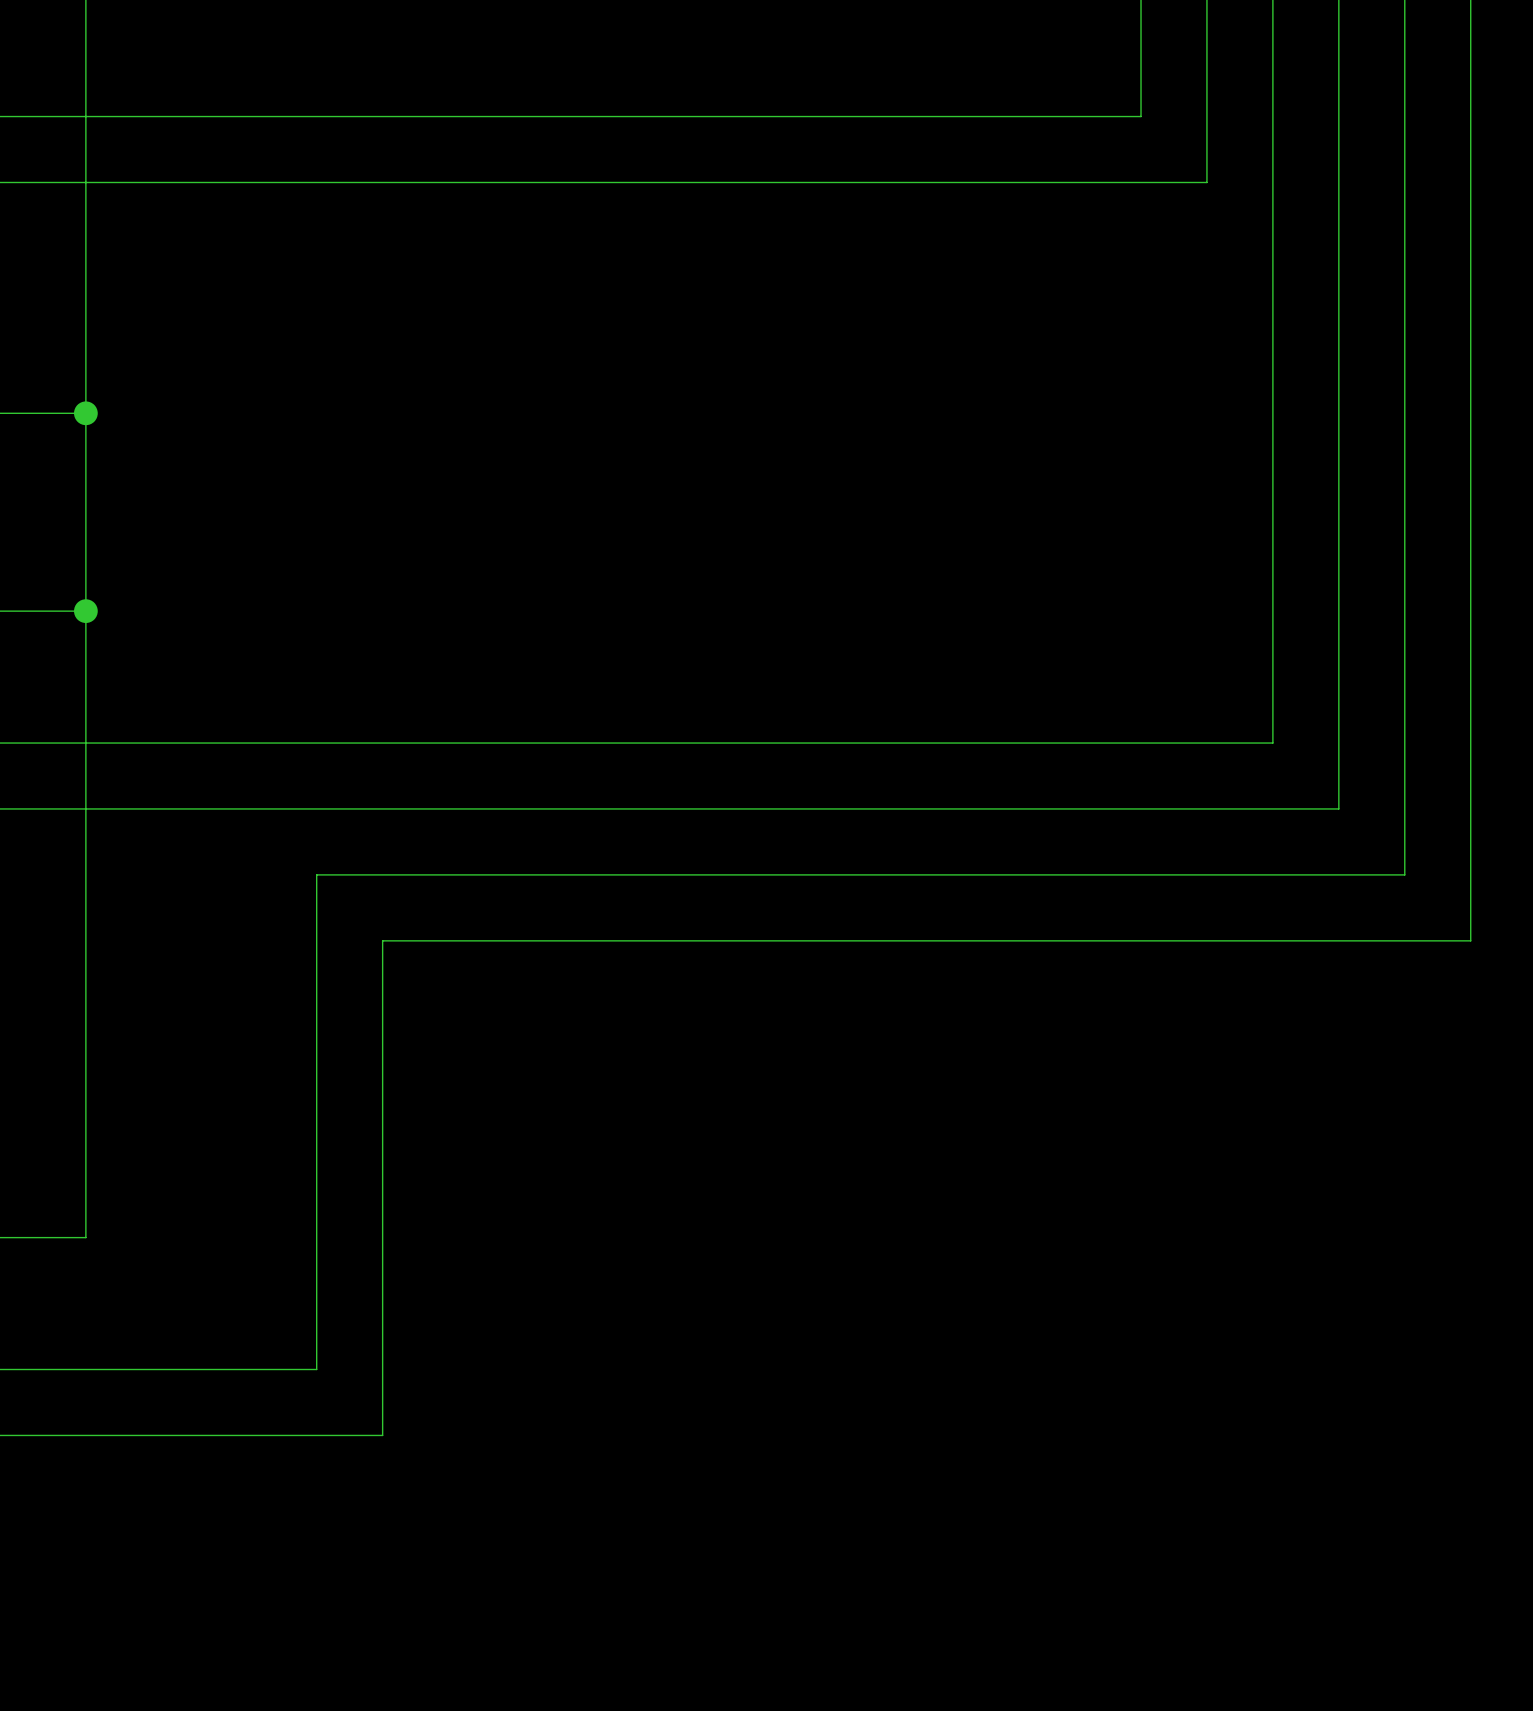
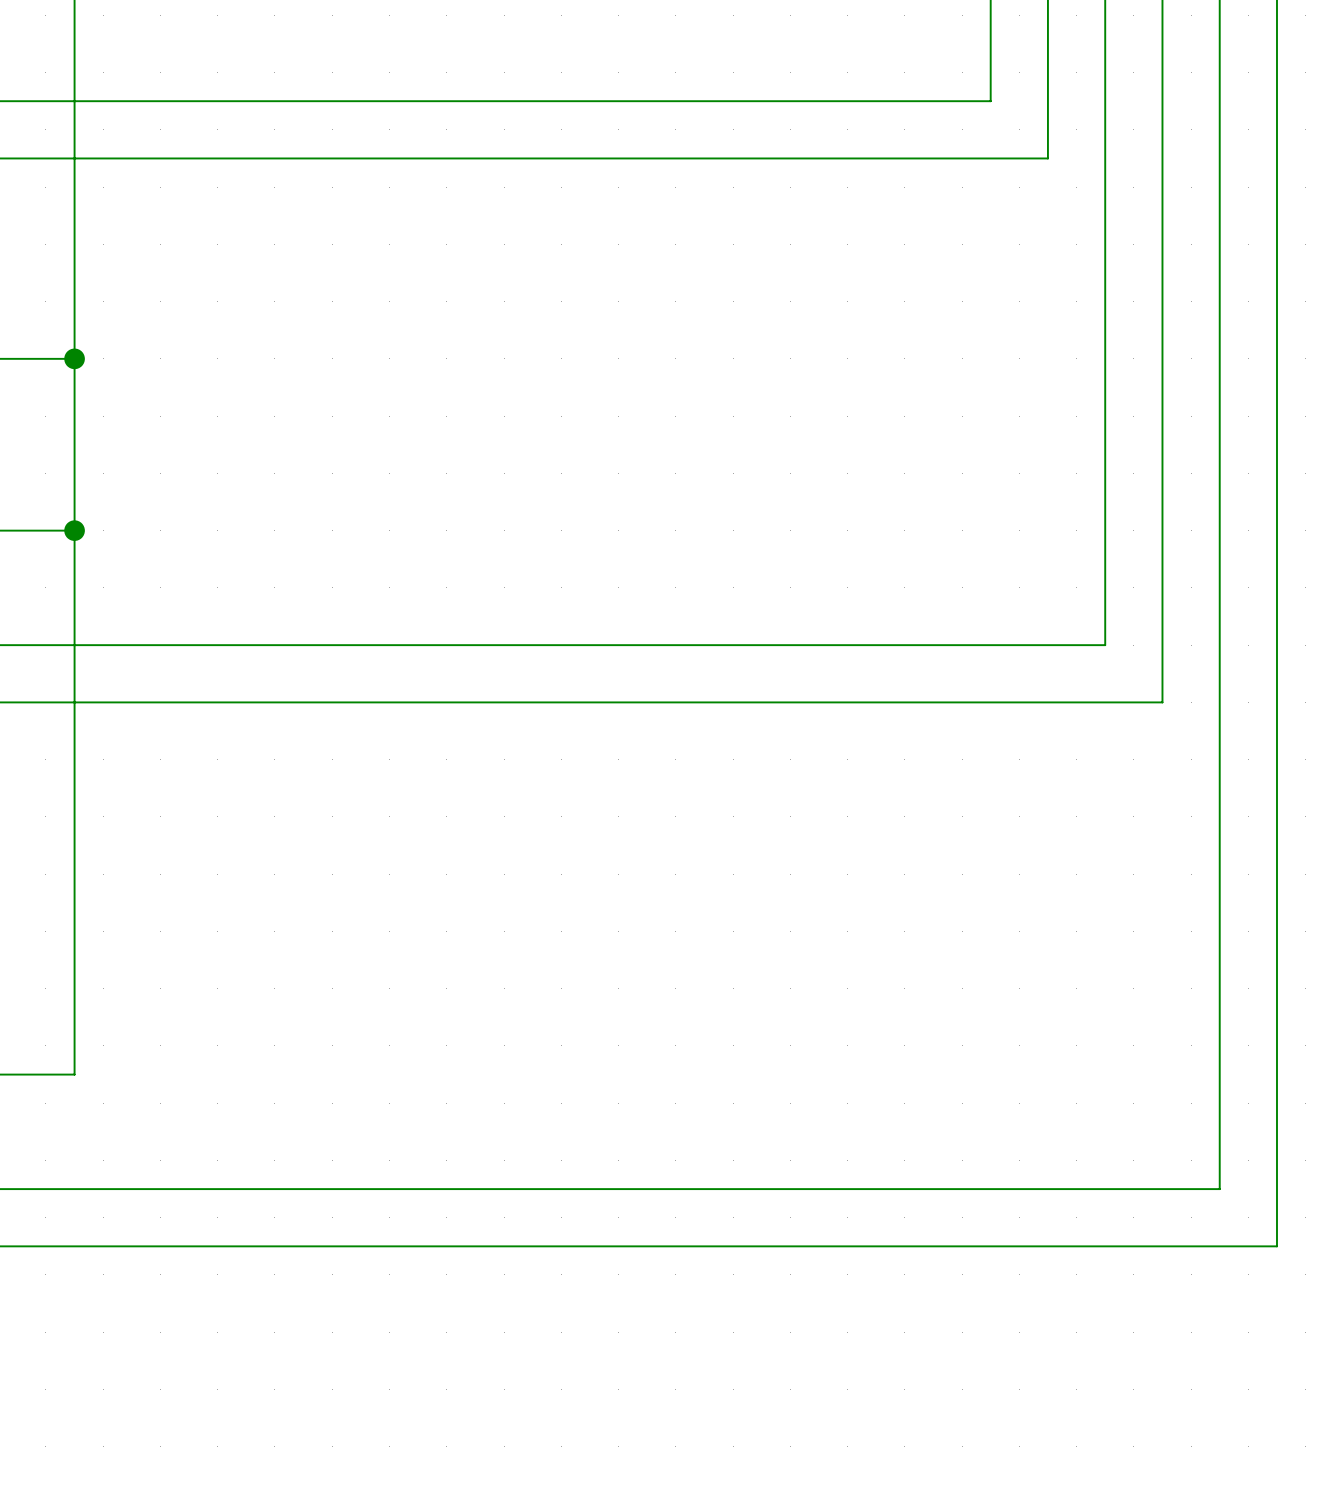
wire: (1404, 874) (316, 874) (316, 1369) -> (1219, 759) (1219, 1189) (274, 1189)
wire: (1470, 940) (382, 940) (382, 1435) -> (1276, 816) (1276, 1246) (332, 1246)

